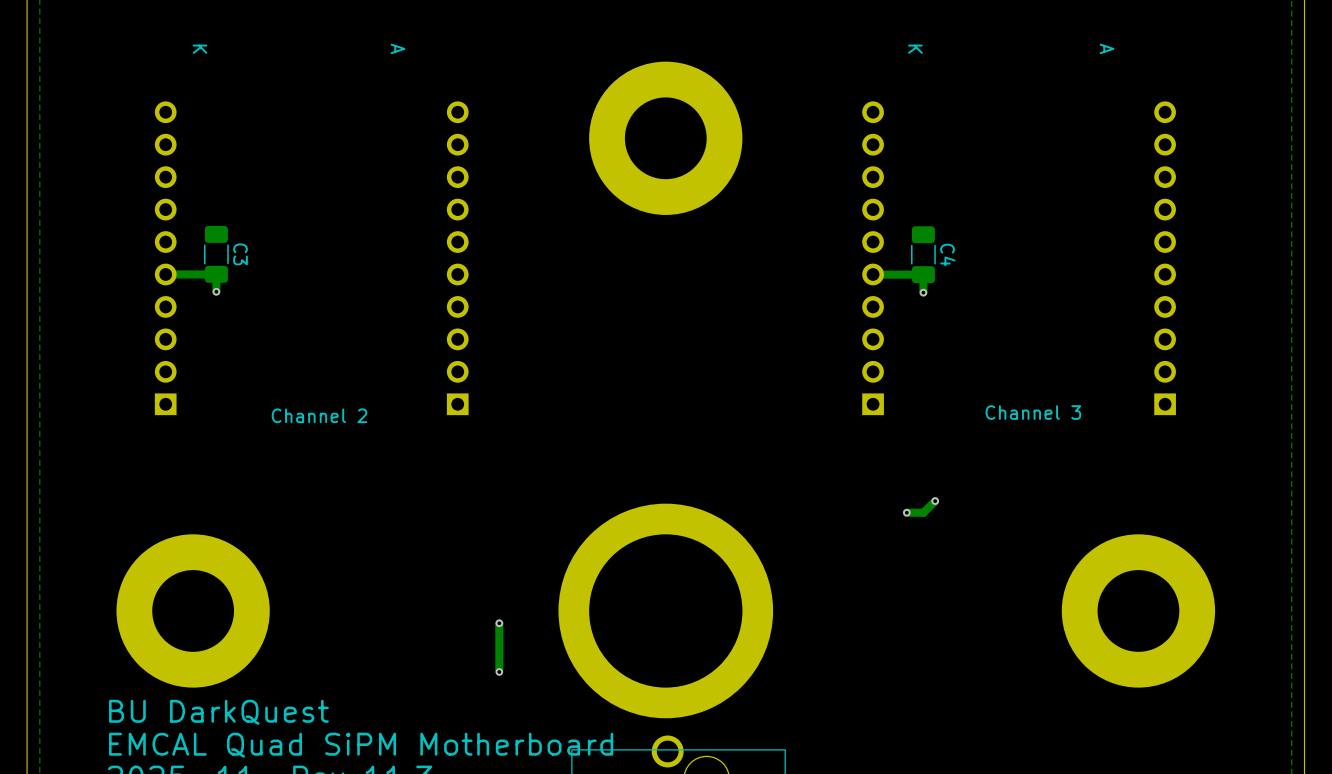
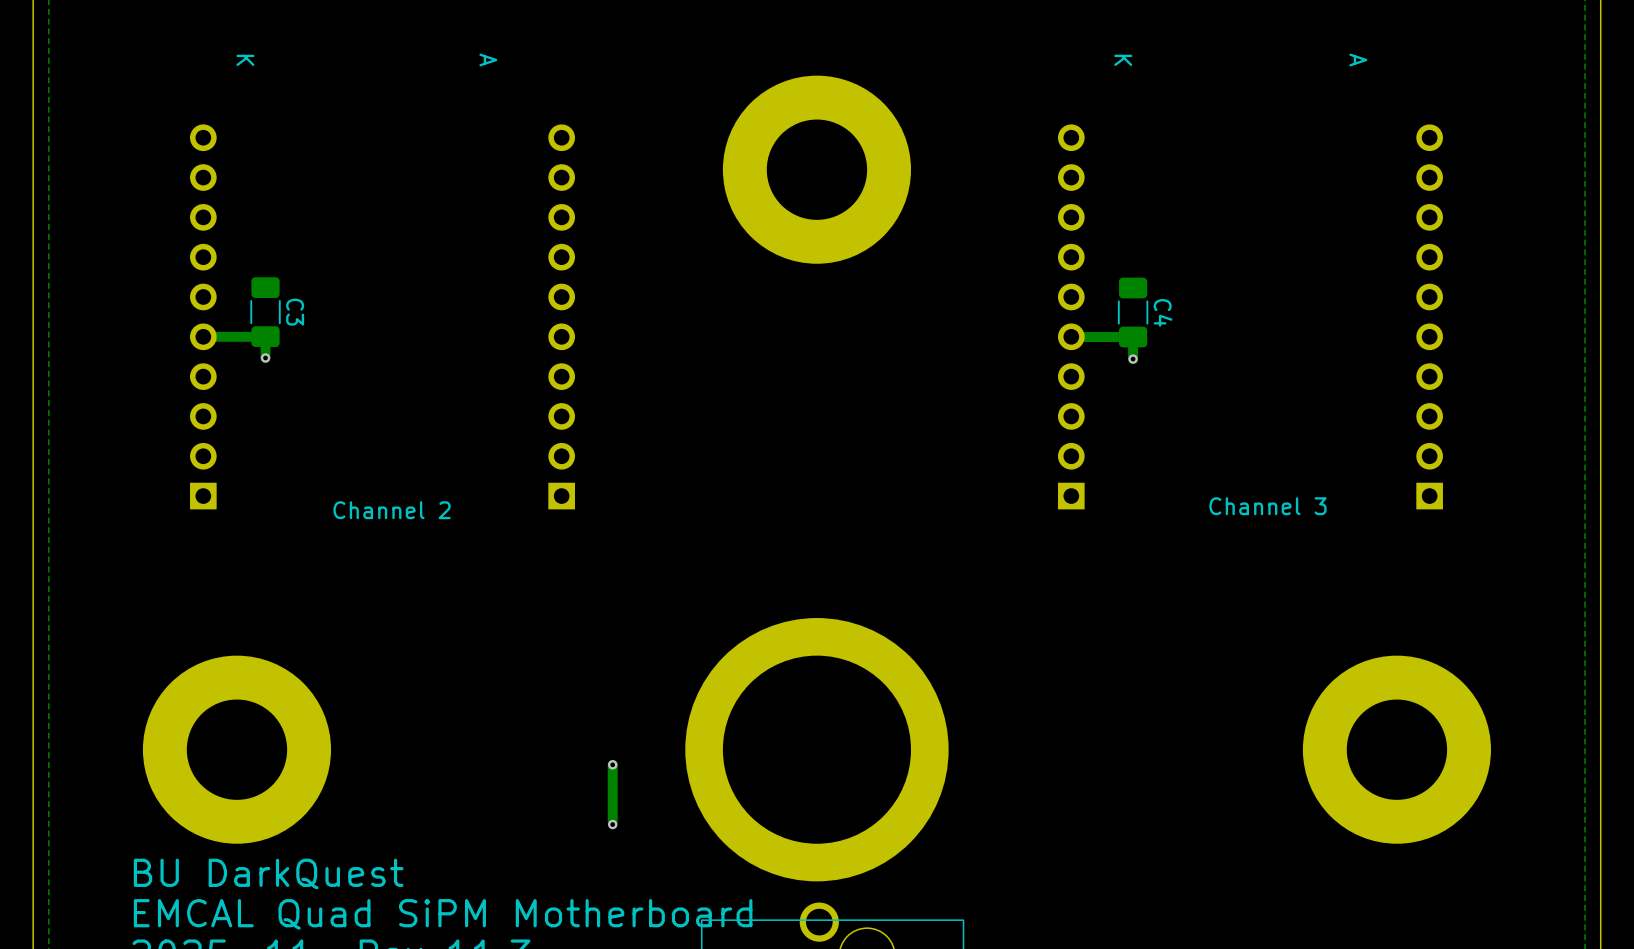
track: (935, 501) (923, 512) (906, 512) -> none
via: (935, 501) -> none
via: (906, 512) -> none

